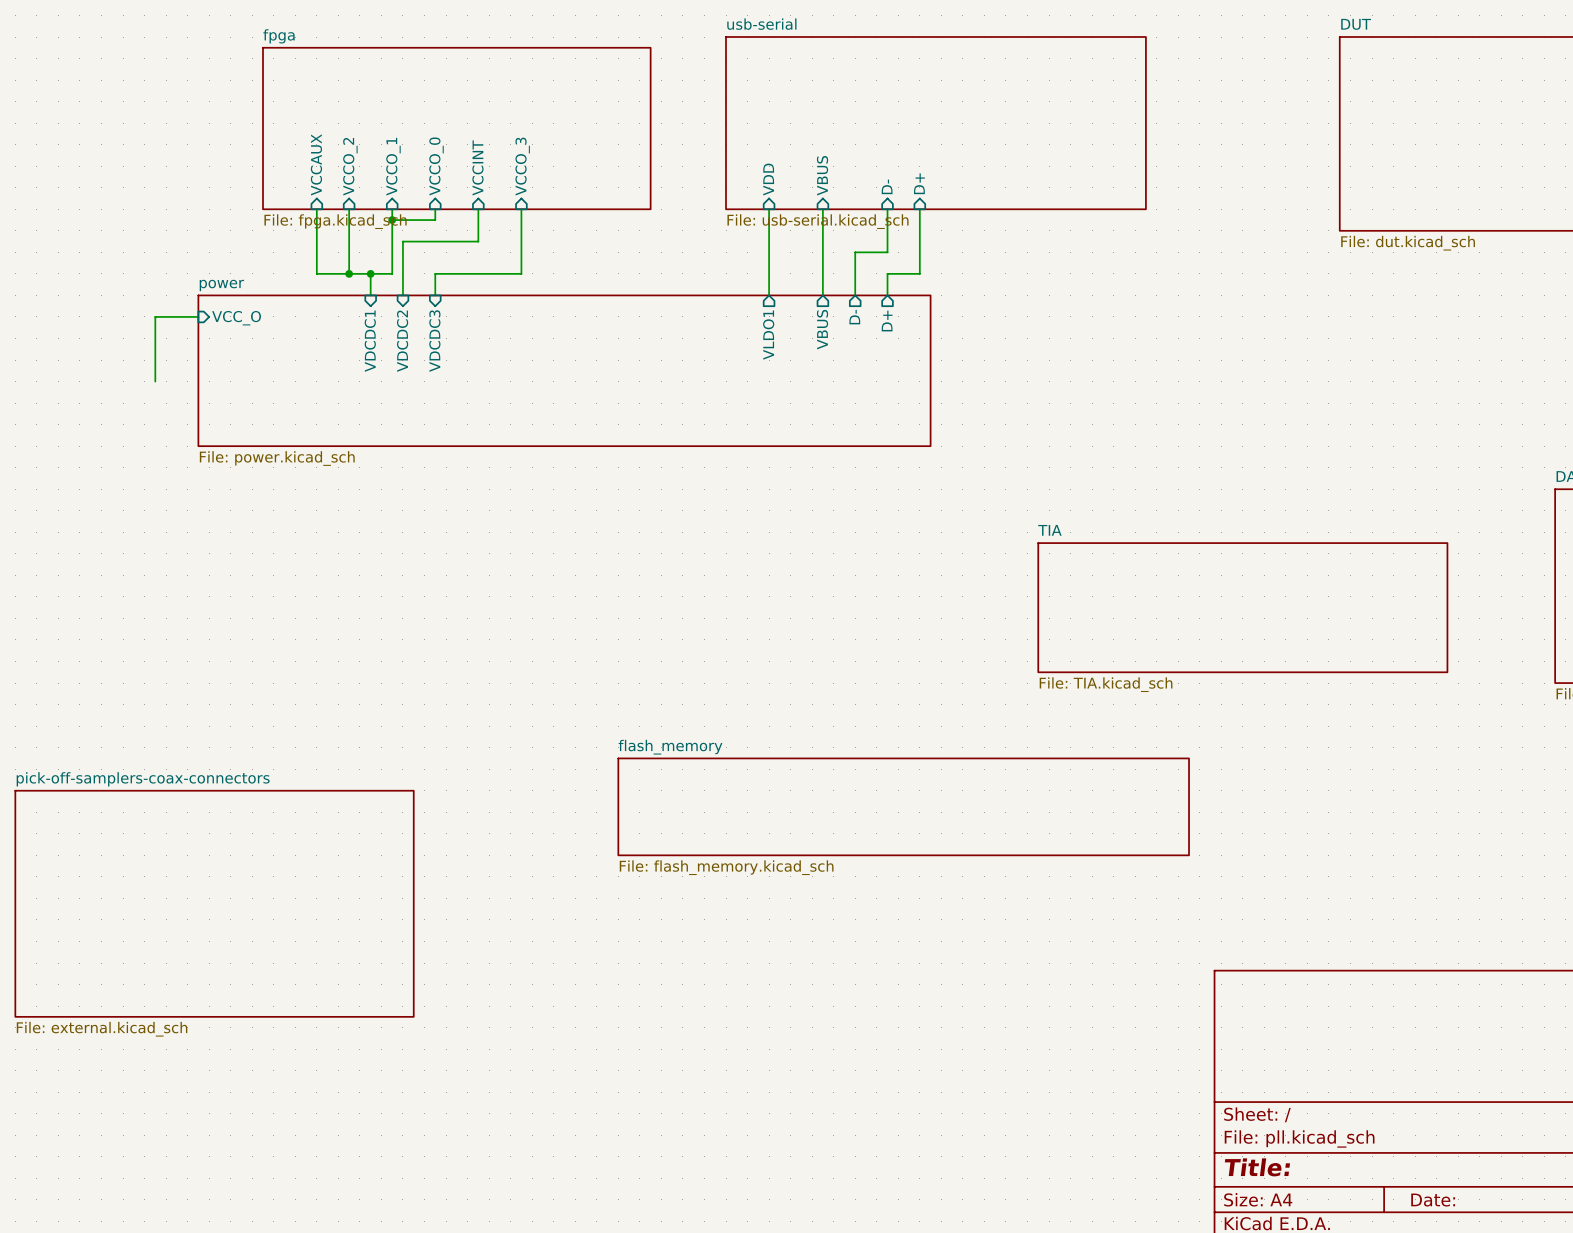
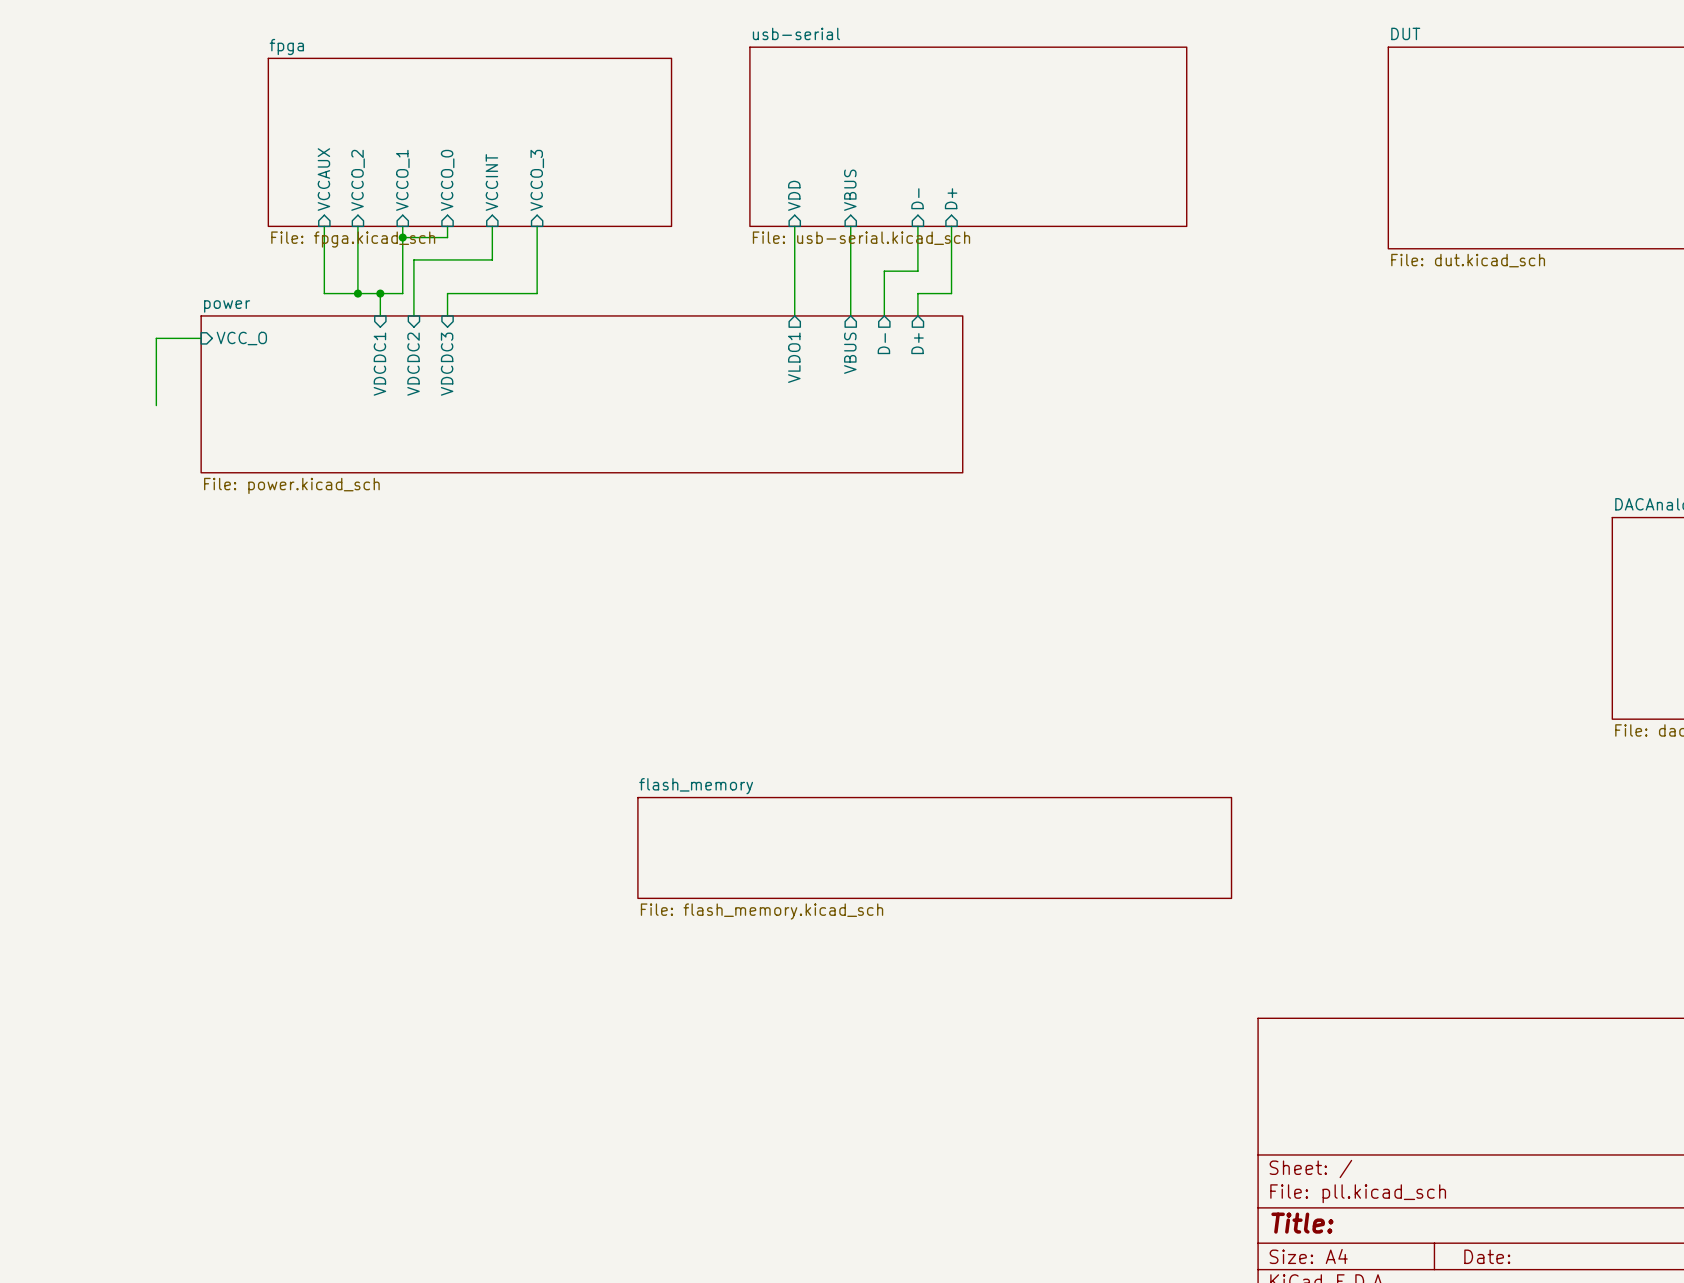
sheet TIA: File: TIA.kicad_sch (1242, 607) -> none
sheet pick-off-samplers-coax-connectors: File: external.kicad_sch (214, 903) -> none

